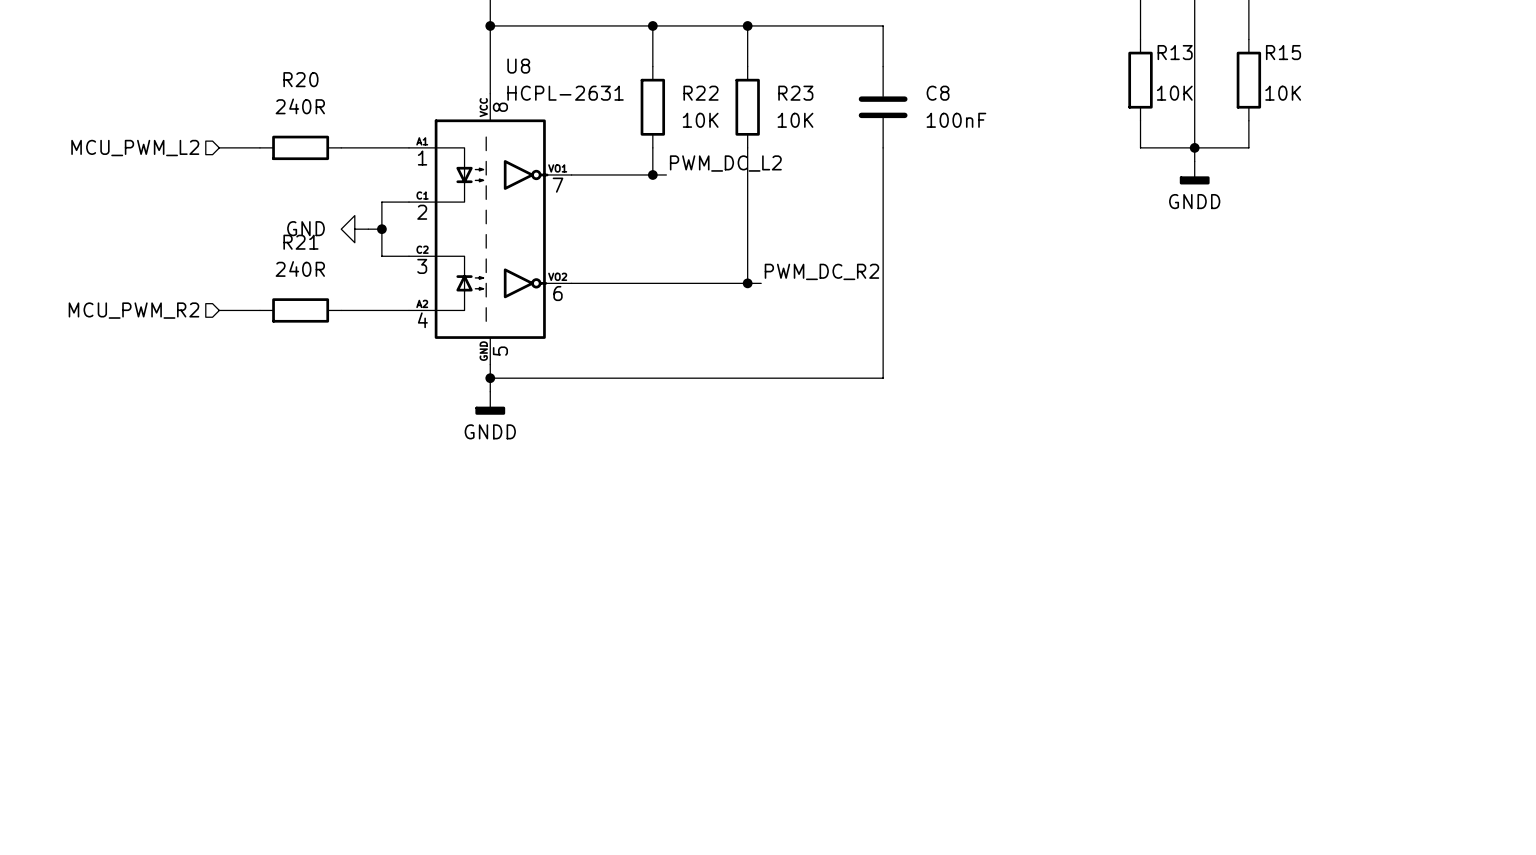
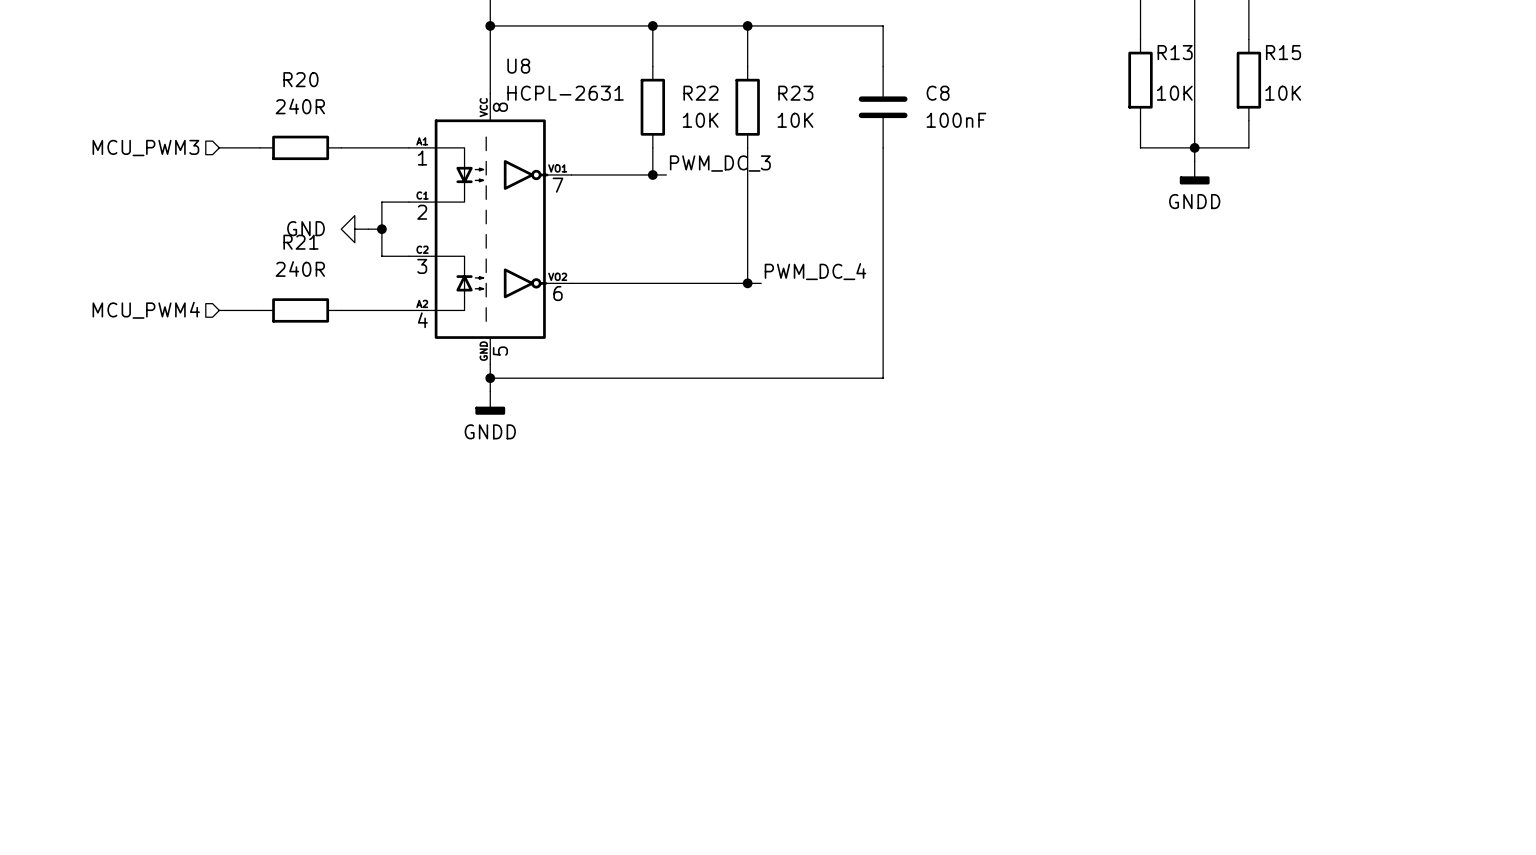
hierarchical label: MCU_PWM_L2 (135, 148) -> MCU_PWM3 (145, 148)
label: PWM_DC_L2 (725, 163) -> PWM_DC_3 (720, 163)
label: PWM_DC_R2 (821, 271) -> PWM_DC_4 (815, 271)
hierarchical label: MCU_PWM_R2 (133, 310) -> MCU_PWM4 (146, 310)

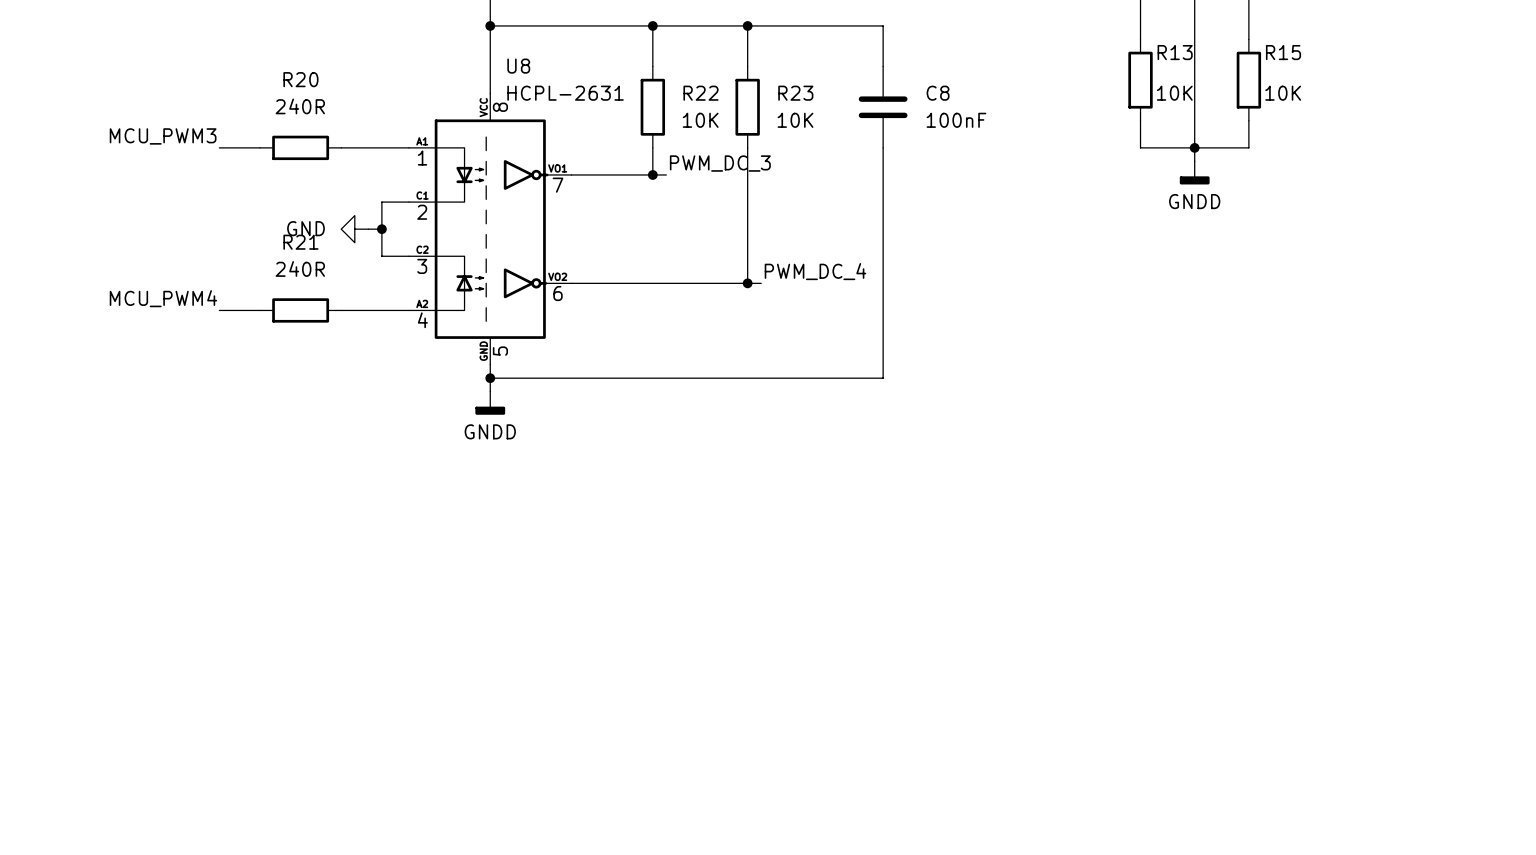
label: none -> MCU_PWM3 (163, 136)
hierarchical label: MCU_PWM3 (145, 148) -> none
label: none -> MCU_PWM4 (163, 298)
hierarchical label: MCU_PWM4 (146, 310) -> none

